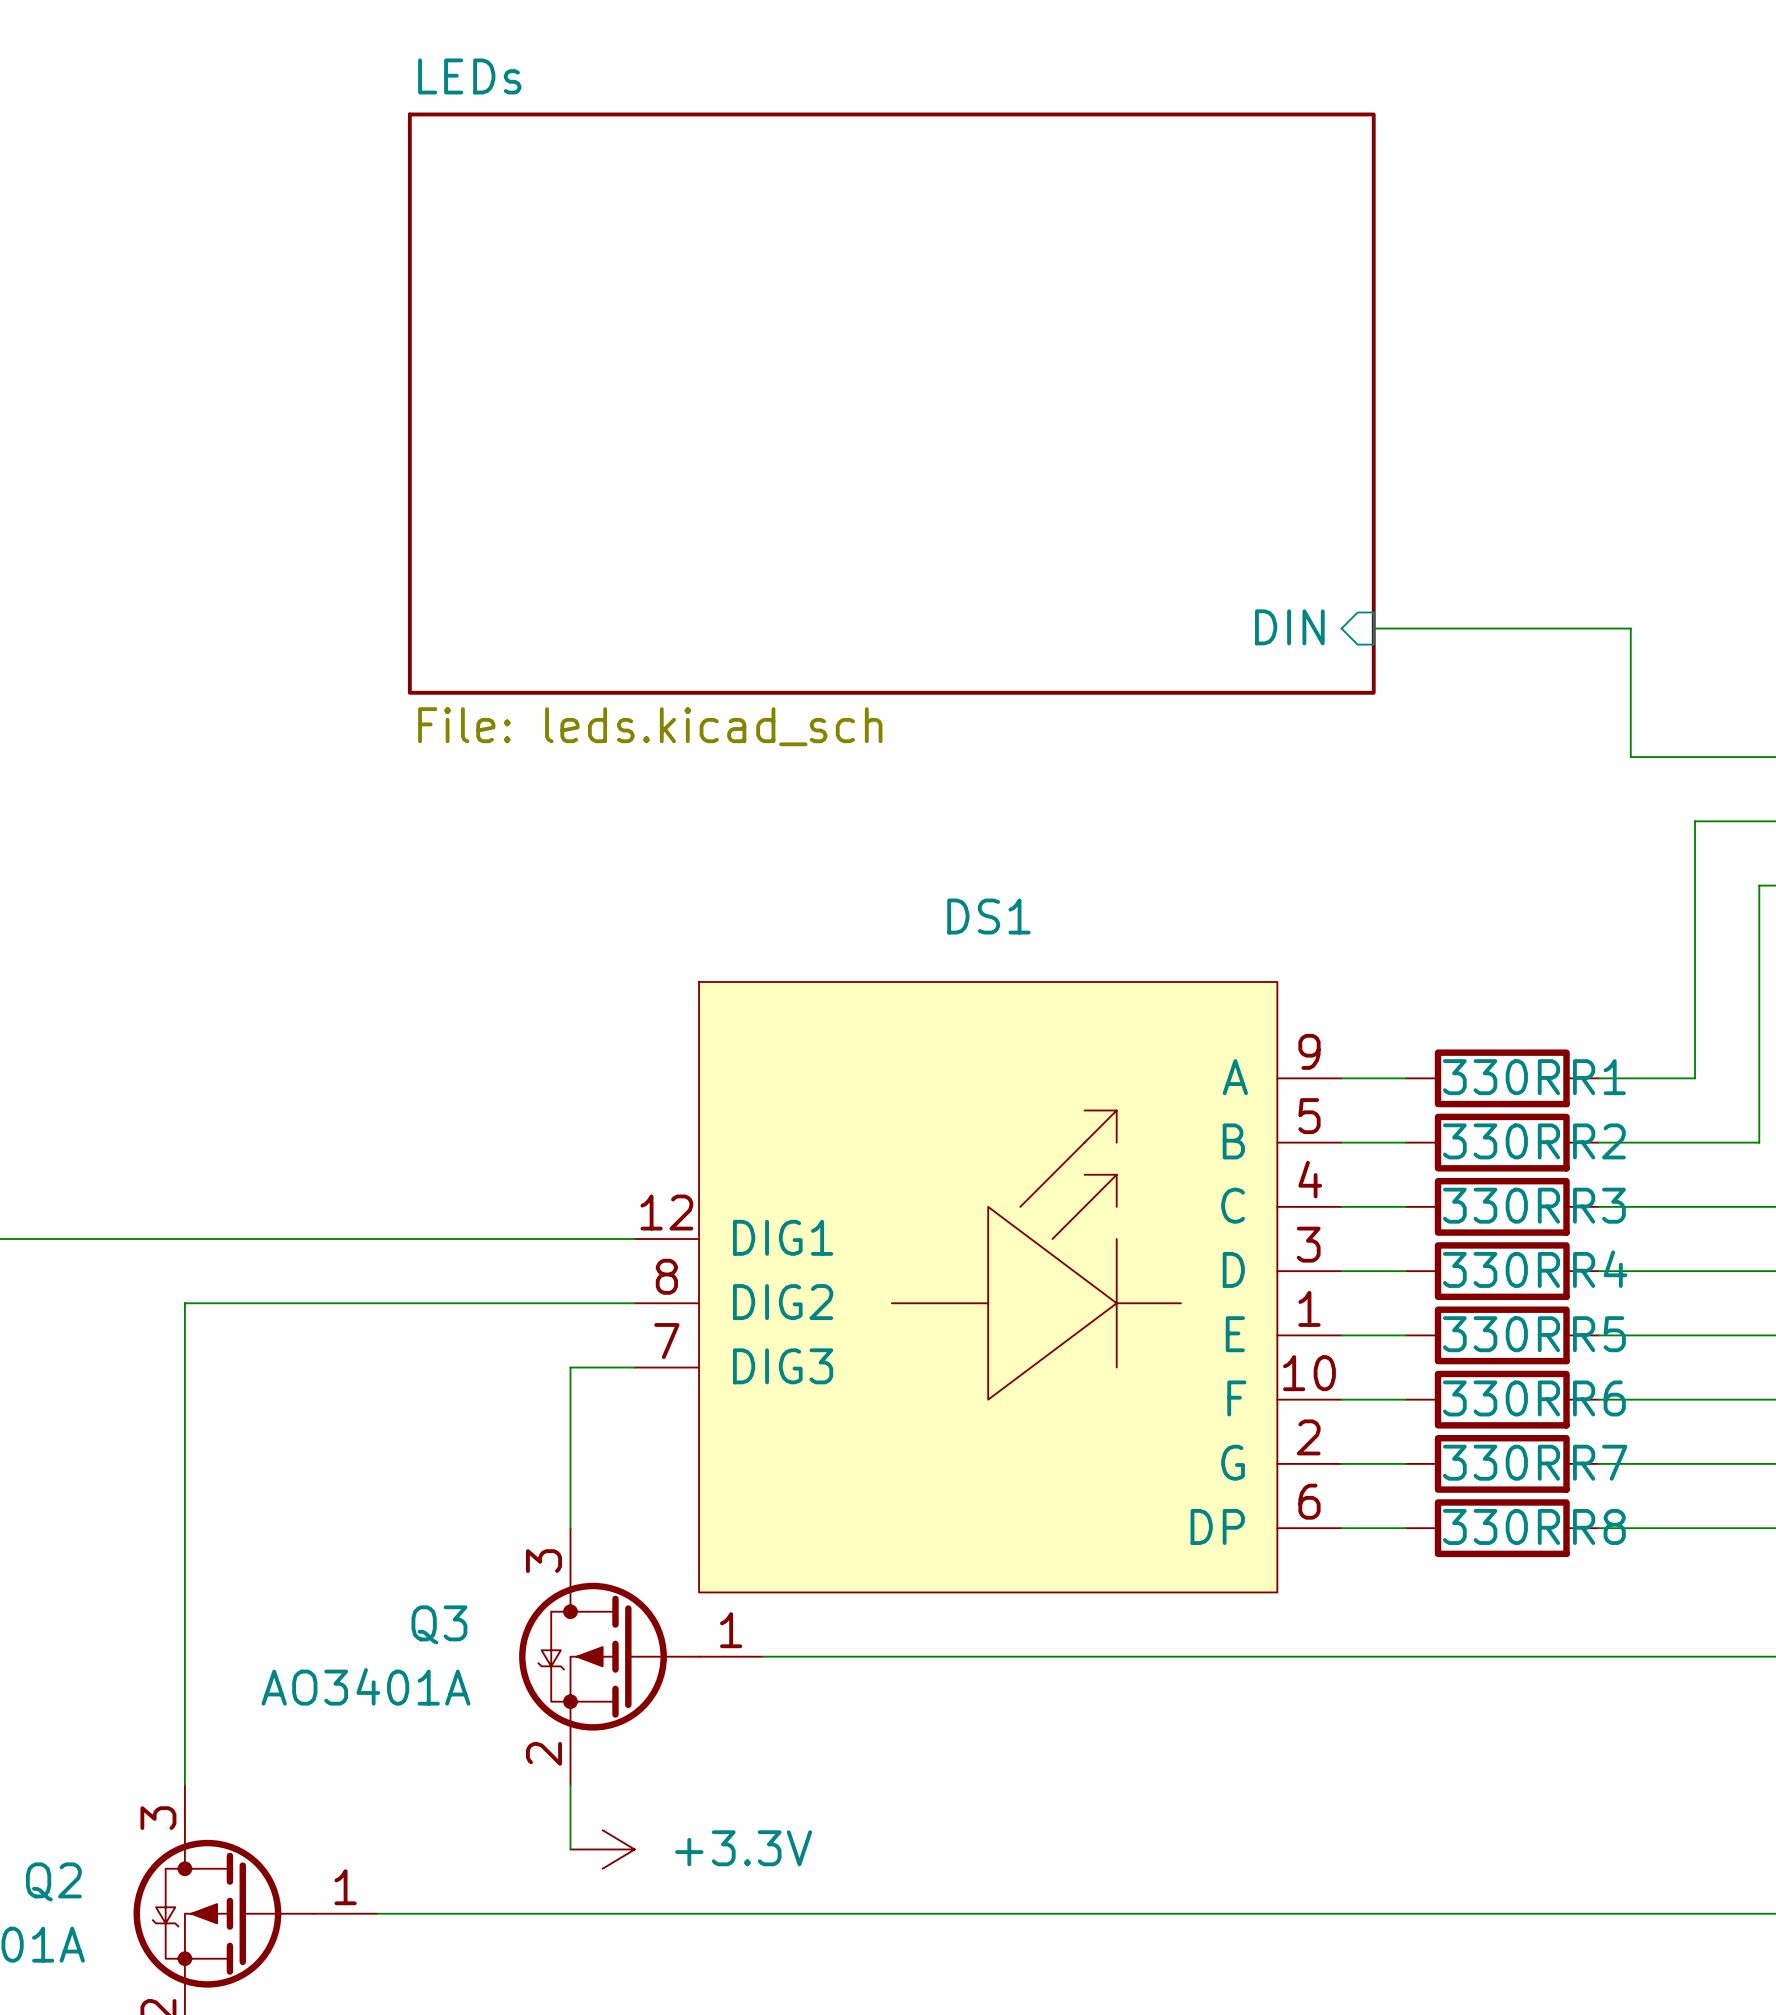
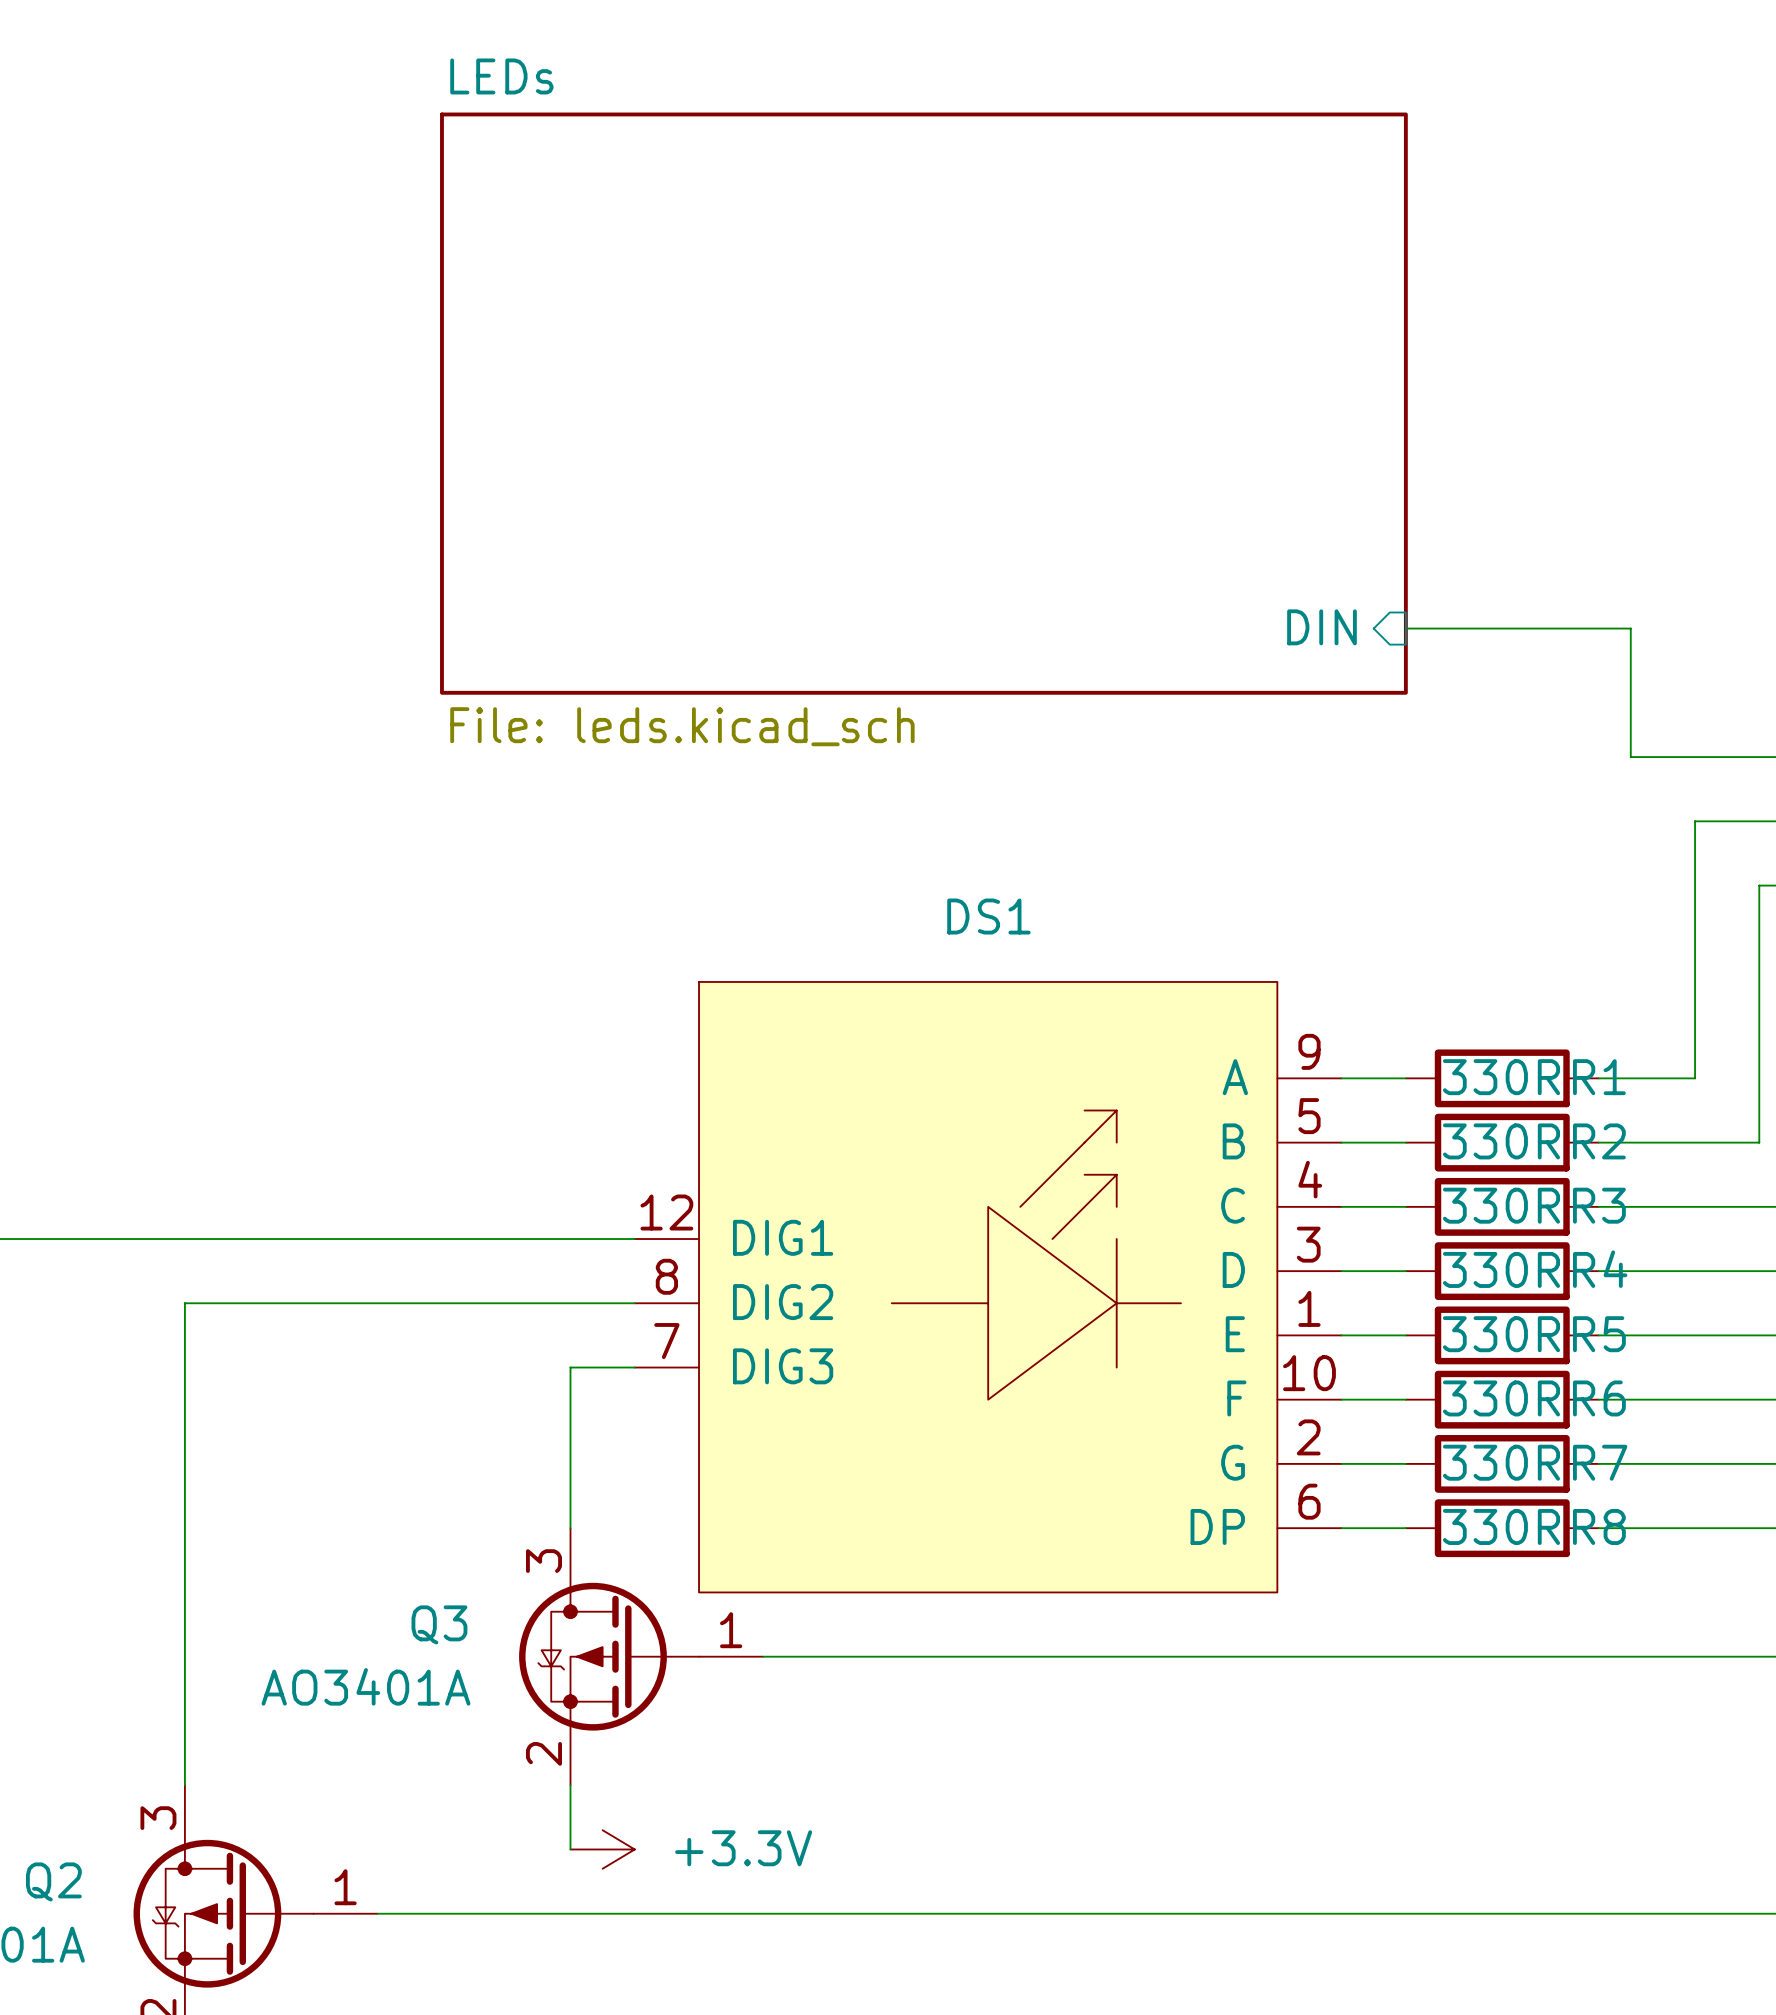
sheet LEDs position: (891, 403) -> (923, 403)
sheet pin position: DIN (1289, 627) -> DIN (1321, 627)
wire: (1373, 628) (1405, 628) -> none

